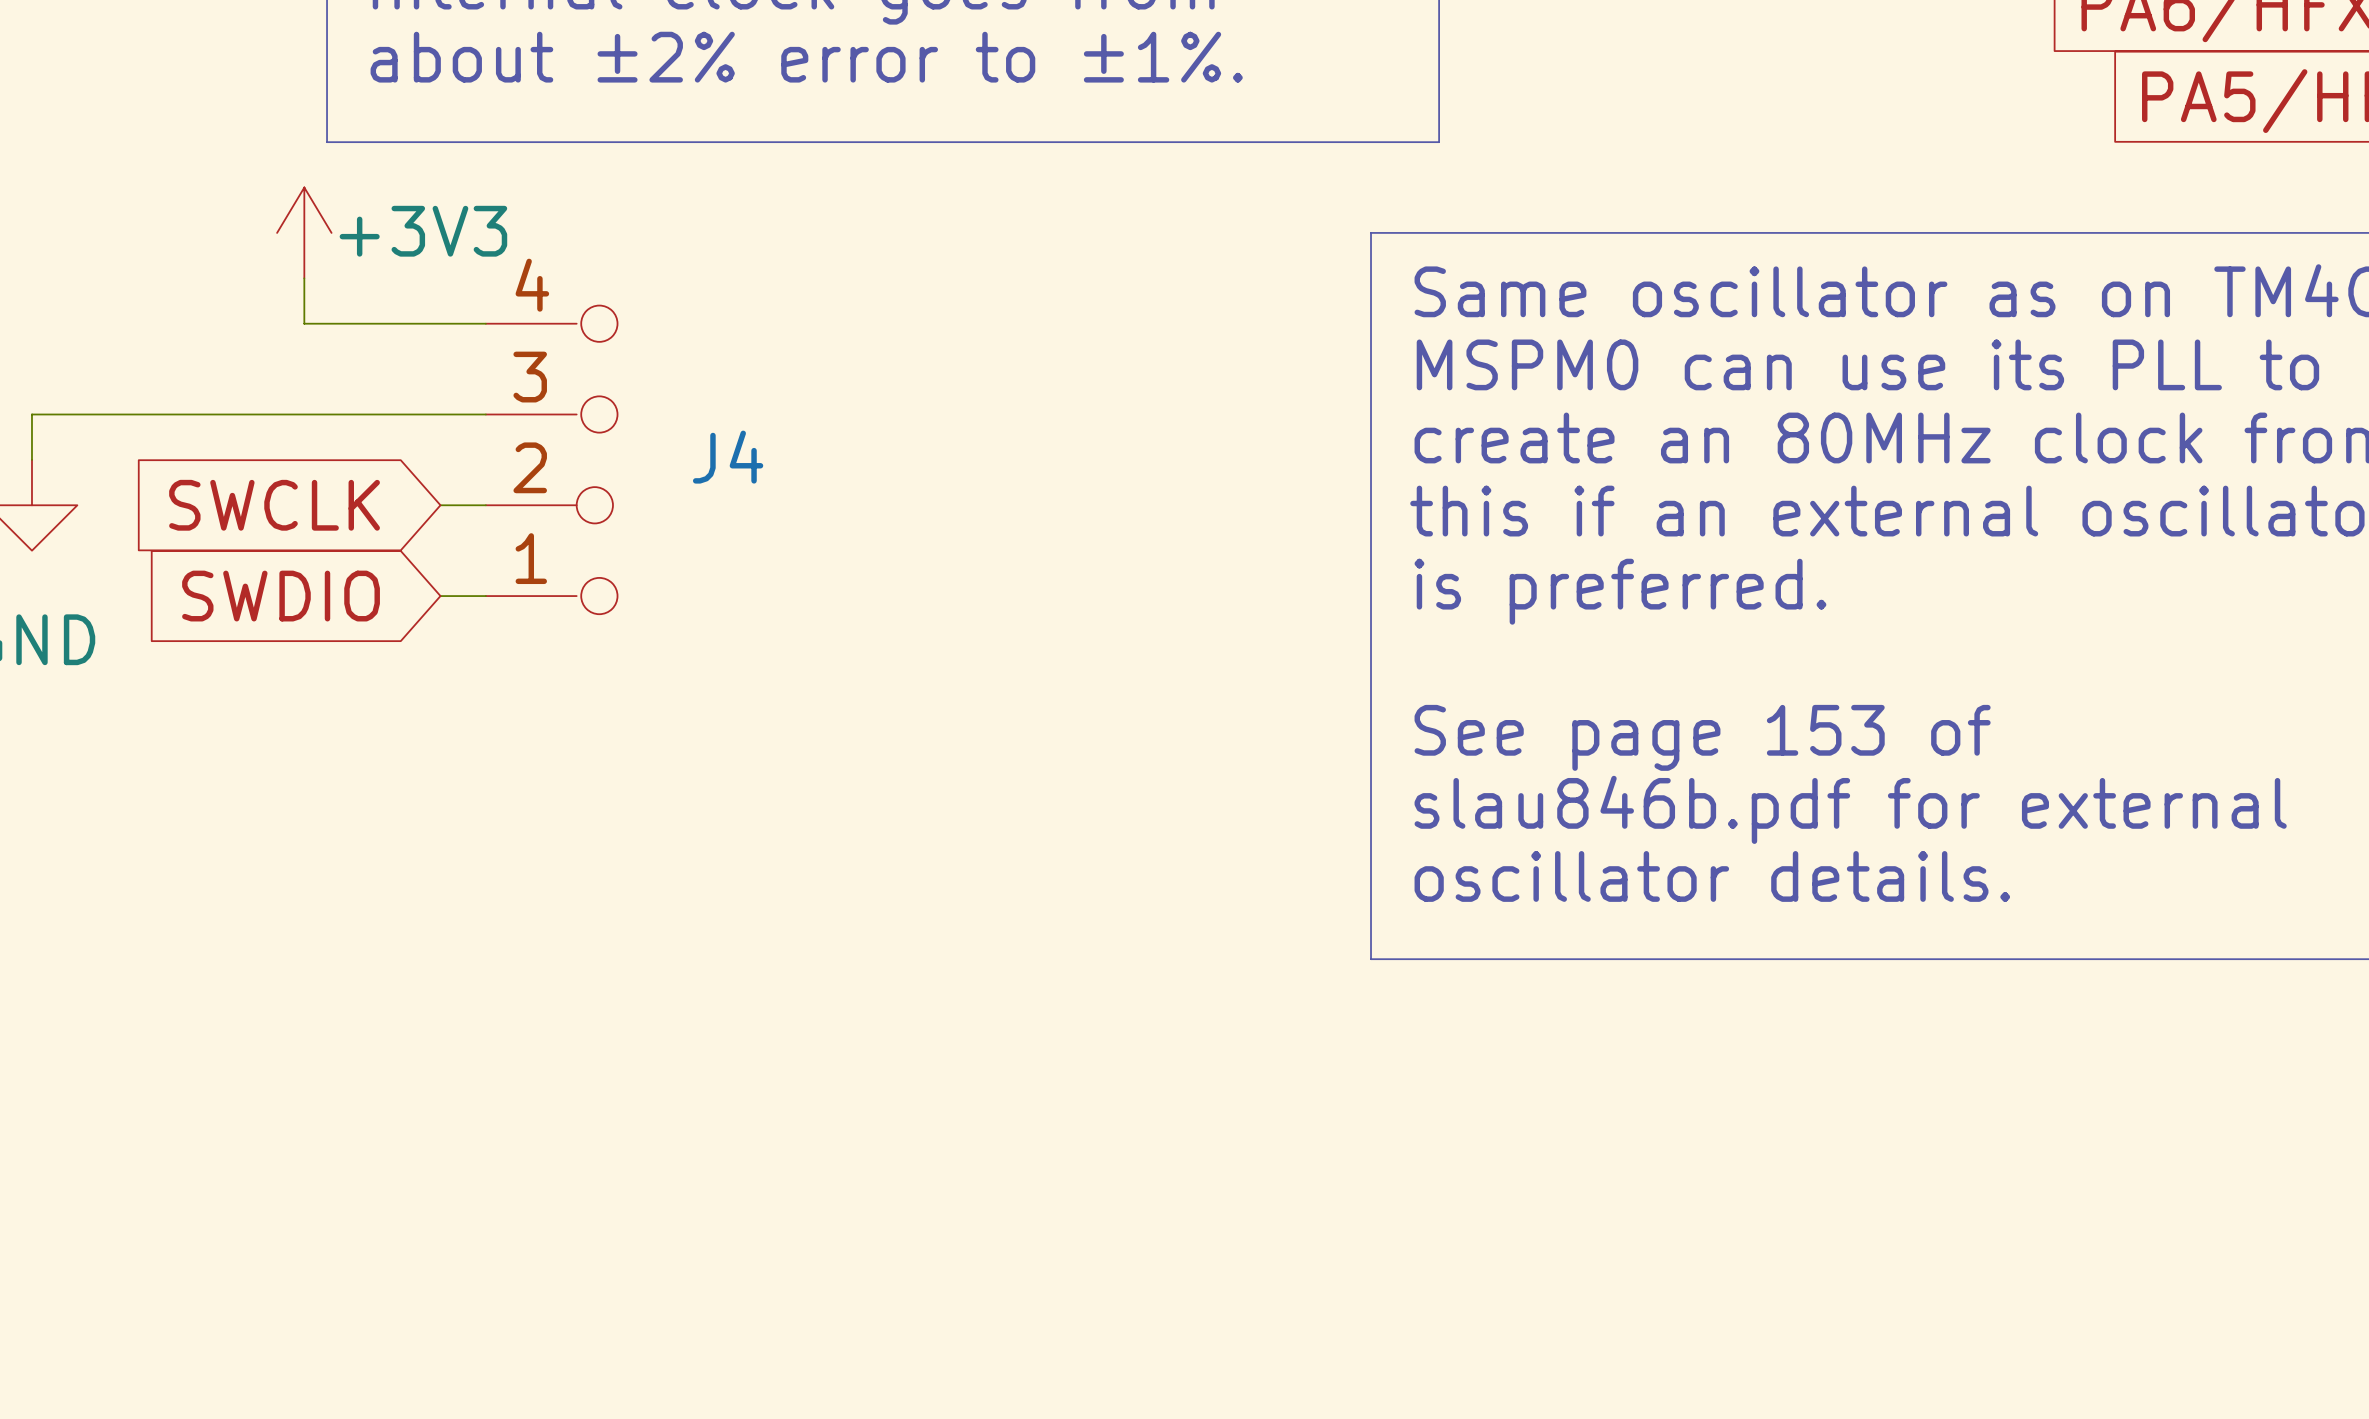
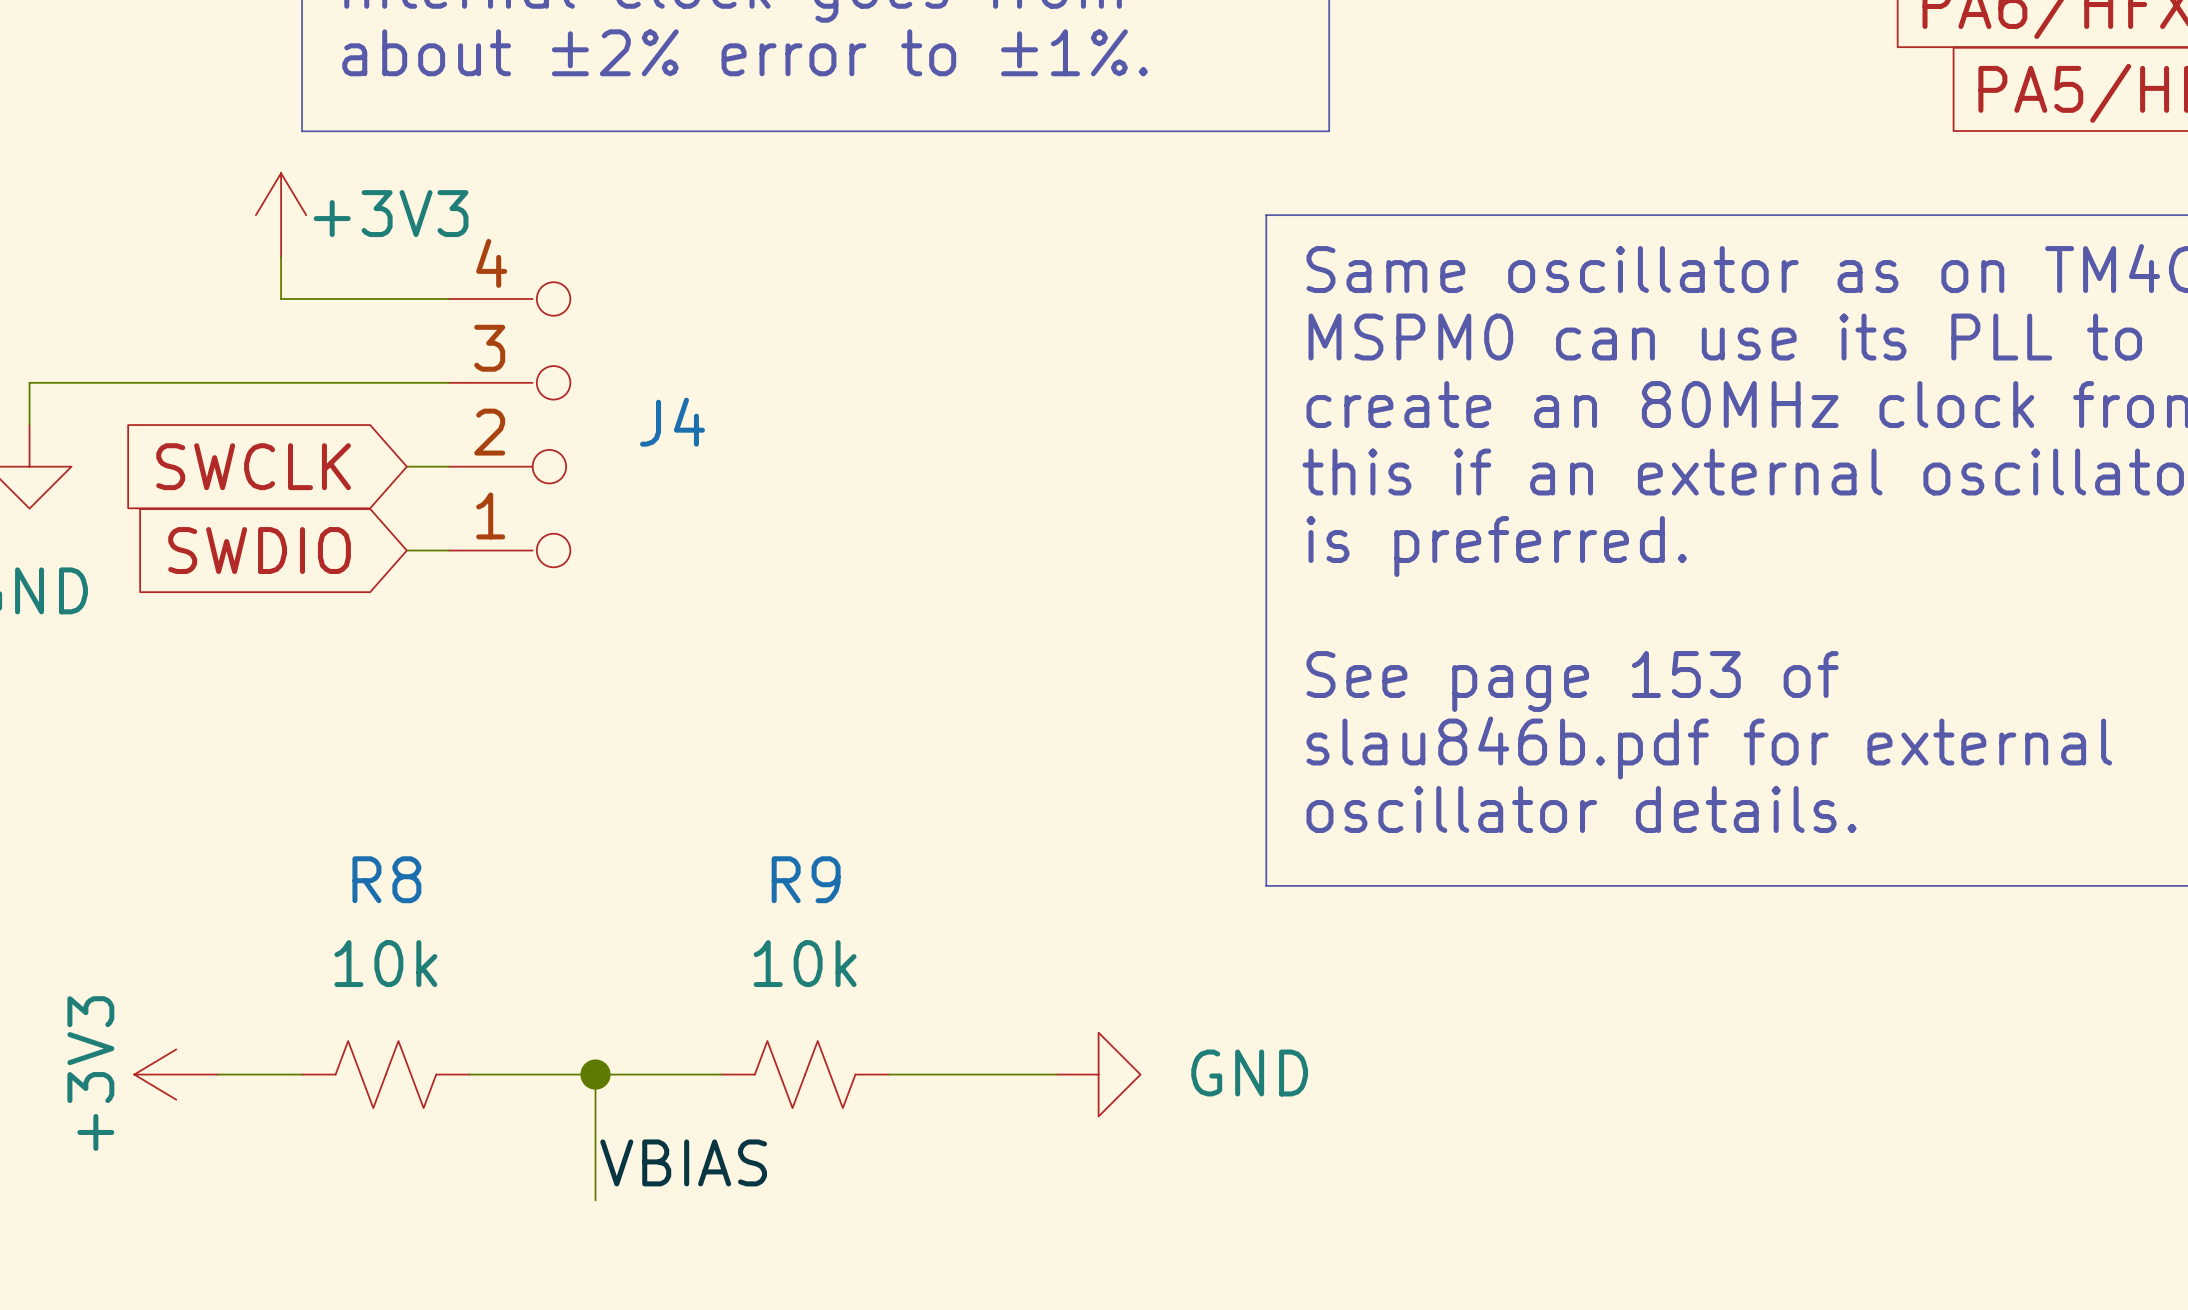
power symbol: none -> +3V3 (176, 1074)
wire: none -> (218, 1074) (302, 1074)
R8: none -> 10k (385, 1074)
wire: none -> (469, 1074) (721, 1074)
wire: none -> (595, 1074) (595, 1200)
junction: none -> (595, 1074)
R9: none -> 10k (805, 1074)
wire: none -> (888, 1074) (1056, 1074)
power symbol: none -> GND (1098, 1074)
label: none -> VBIAS (683, 1162)

